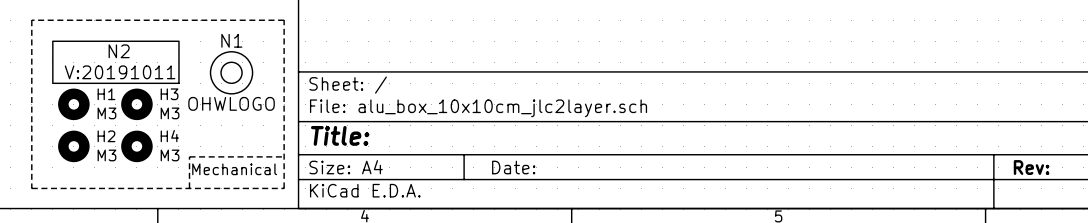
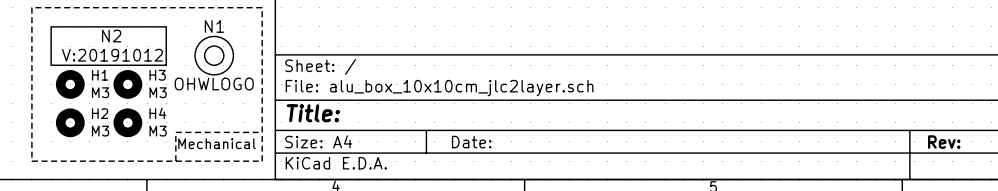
N2 value: V:20191011 (120, 72) -> V:20191012 (112, 55)

